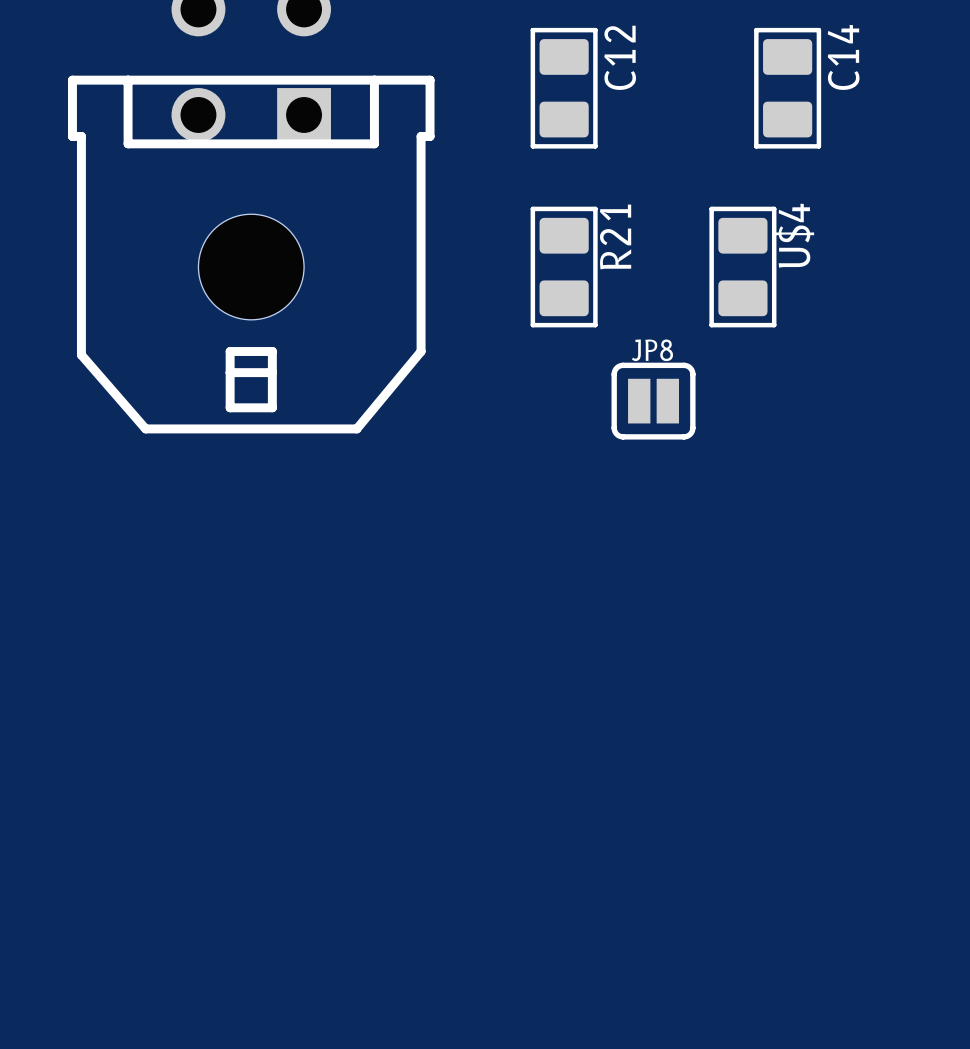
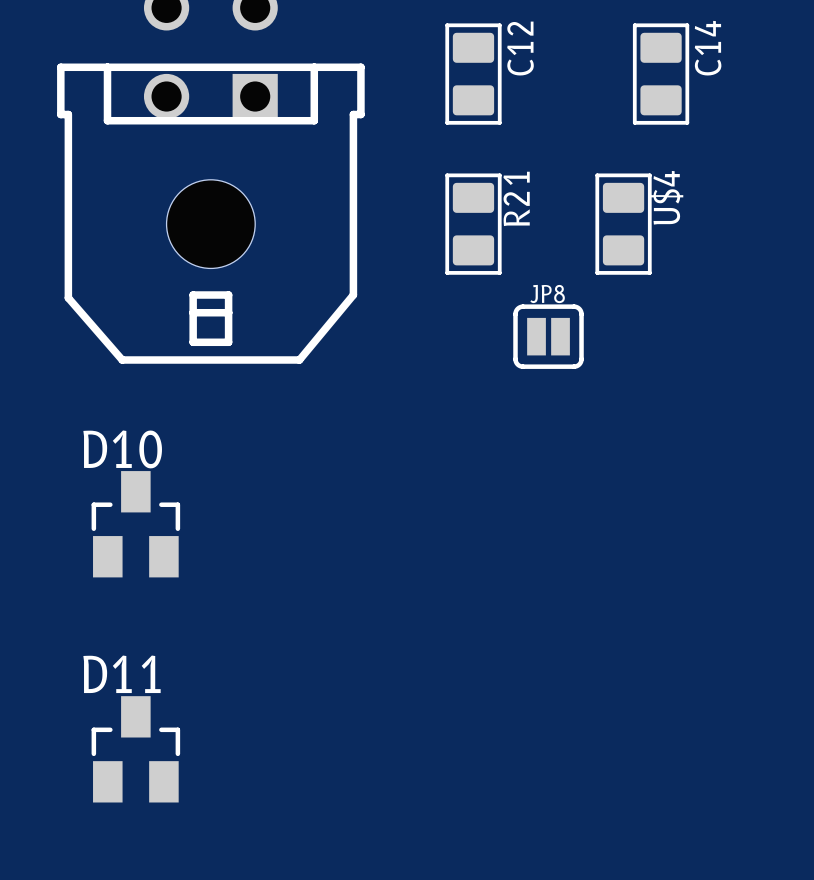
D10: none -> (135, 524)
D11: none -> (135, 749)

